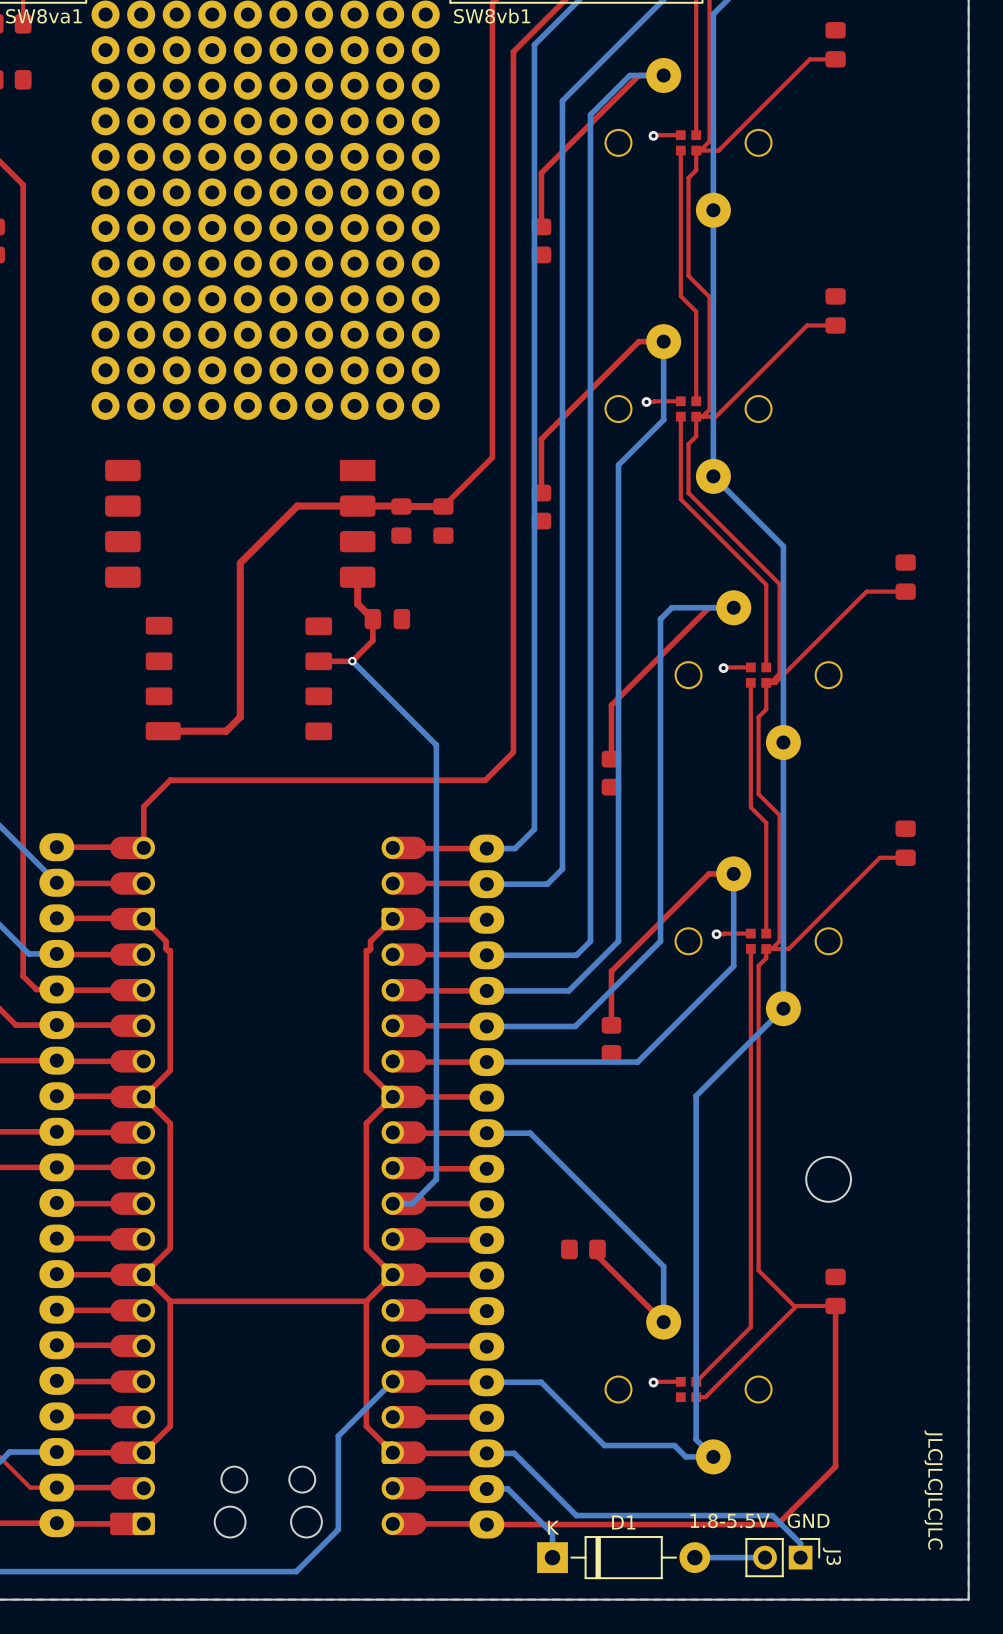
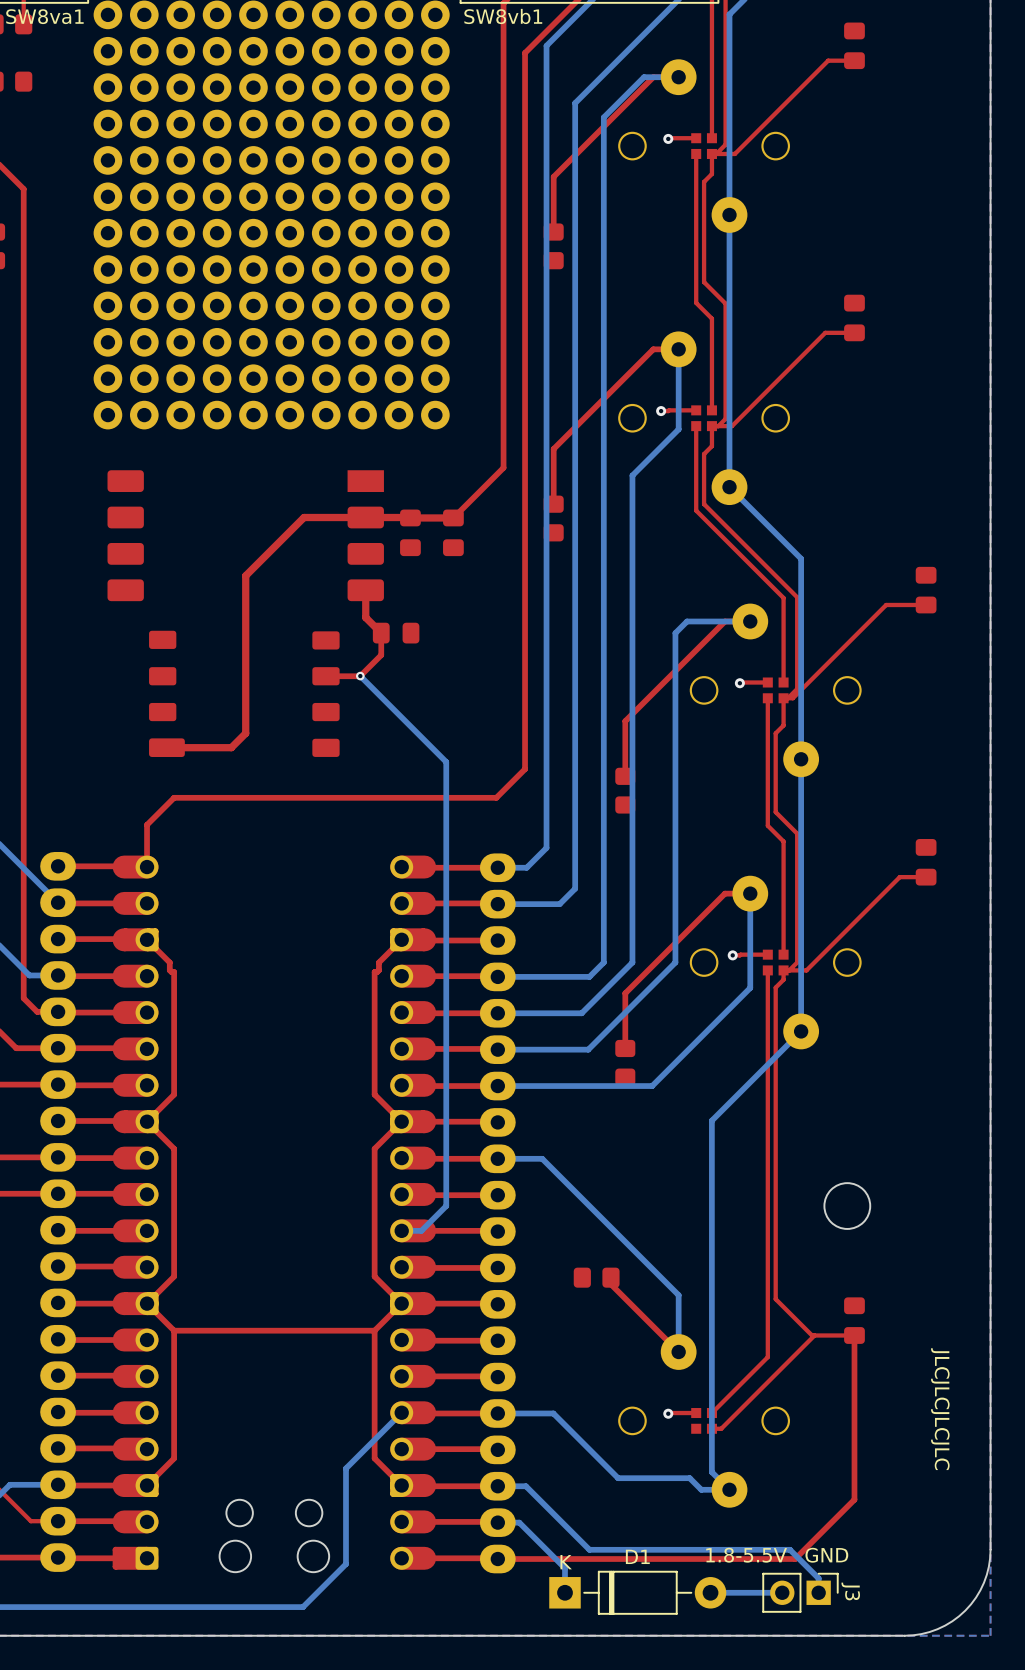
text position: JLCJLCJLCJLC (933, 1490) -> JLCJLCJLCJLC (940, 1409)
board edge: (968, 1515) (968, 1599) (884, 1599) -> (990, 1549) (988, 1566) (984, 1582) (976, 1597) (965, 1610) (952, 1621) (937, 1629) (921, 1634) (904, 1635)

